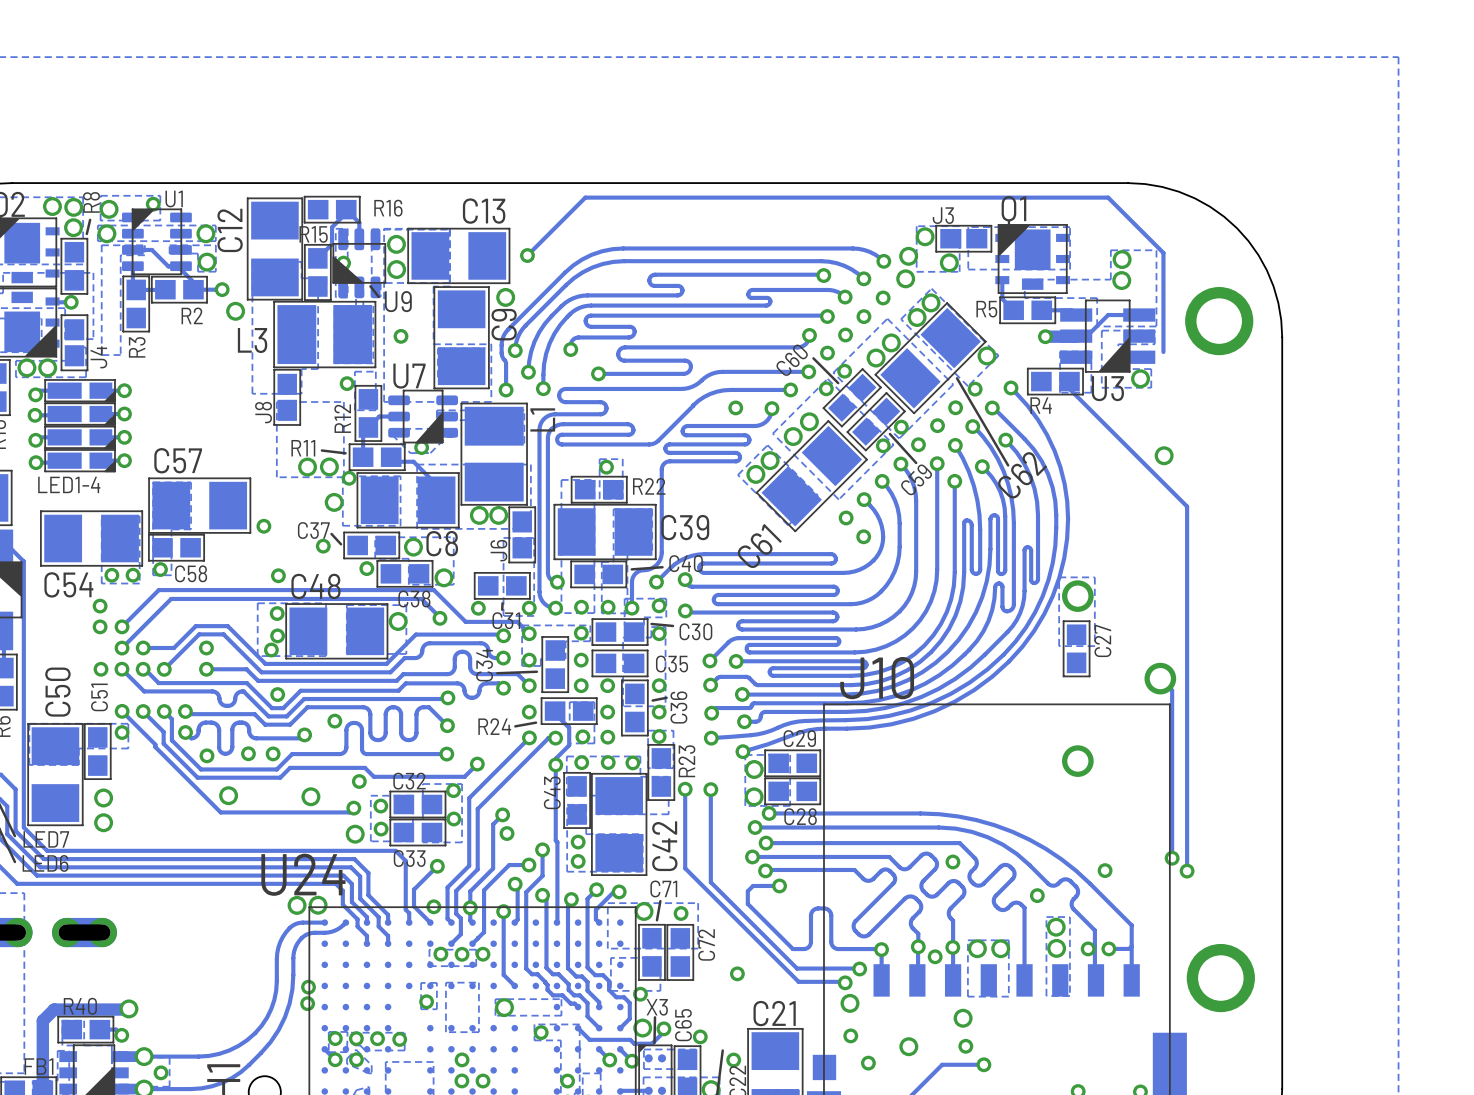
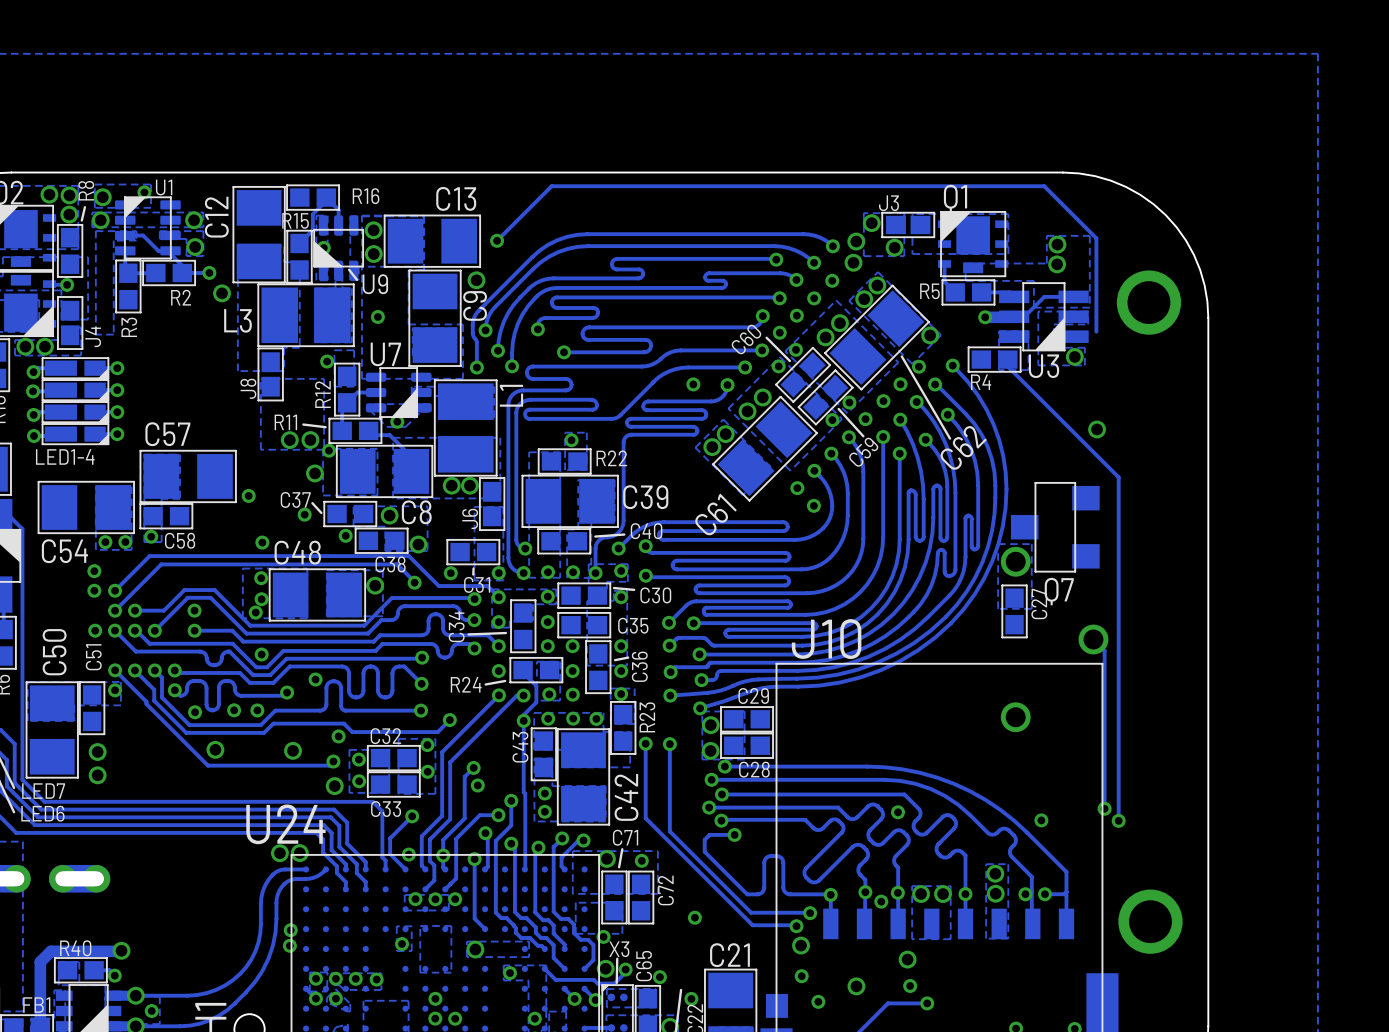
Q7: none -> (1055, 527)
via position: (1037, 895) -> (965, 894)

